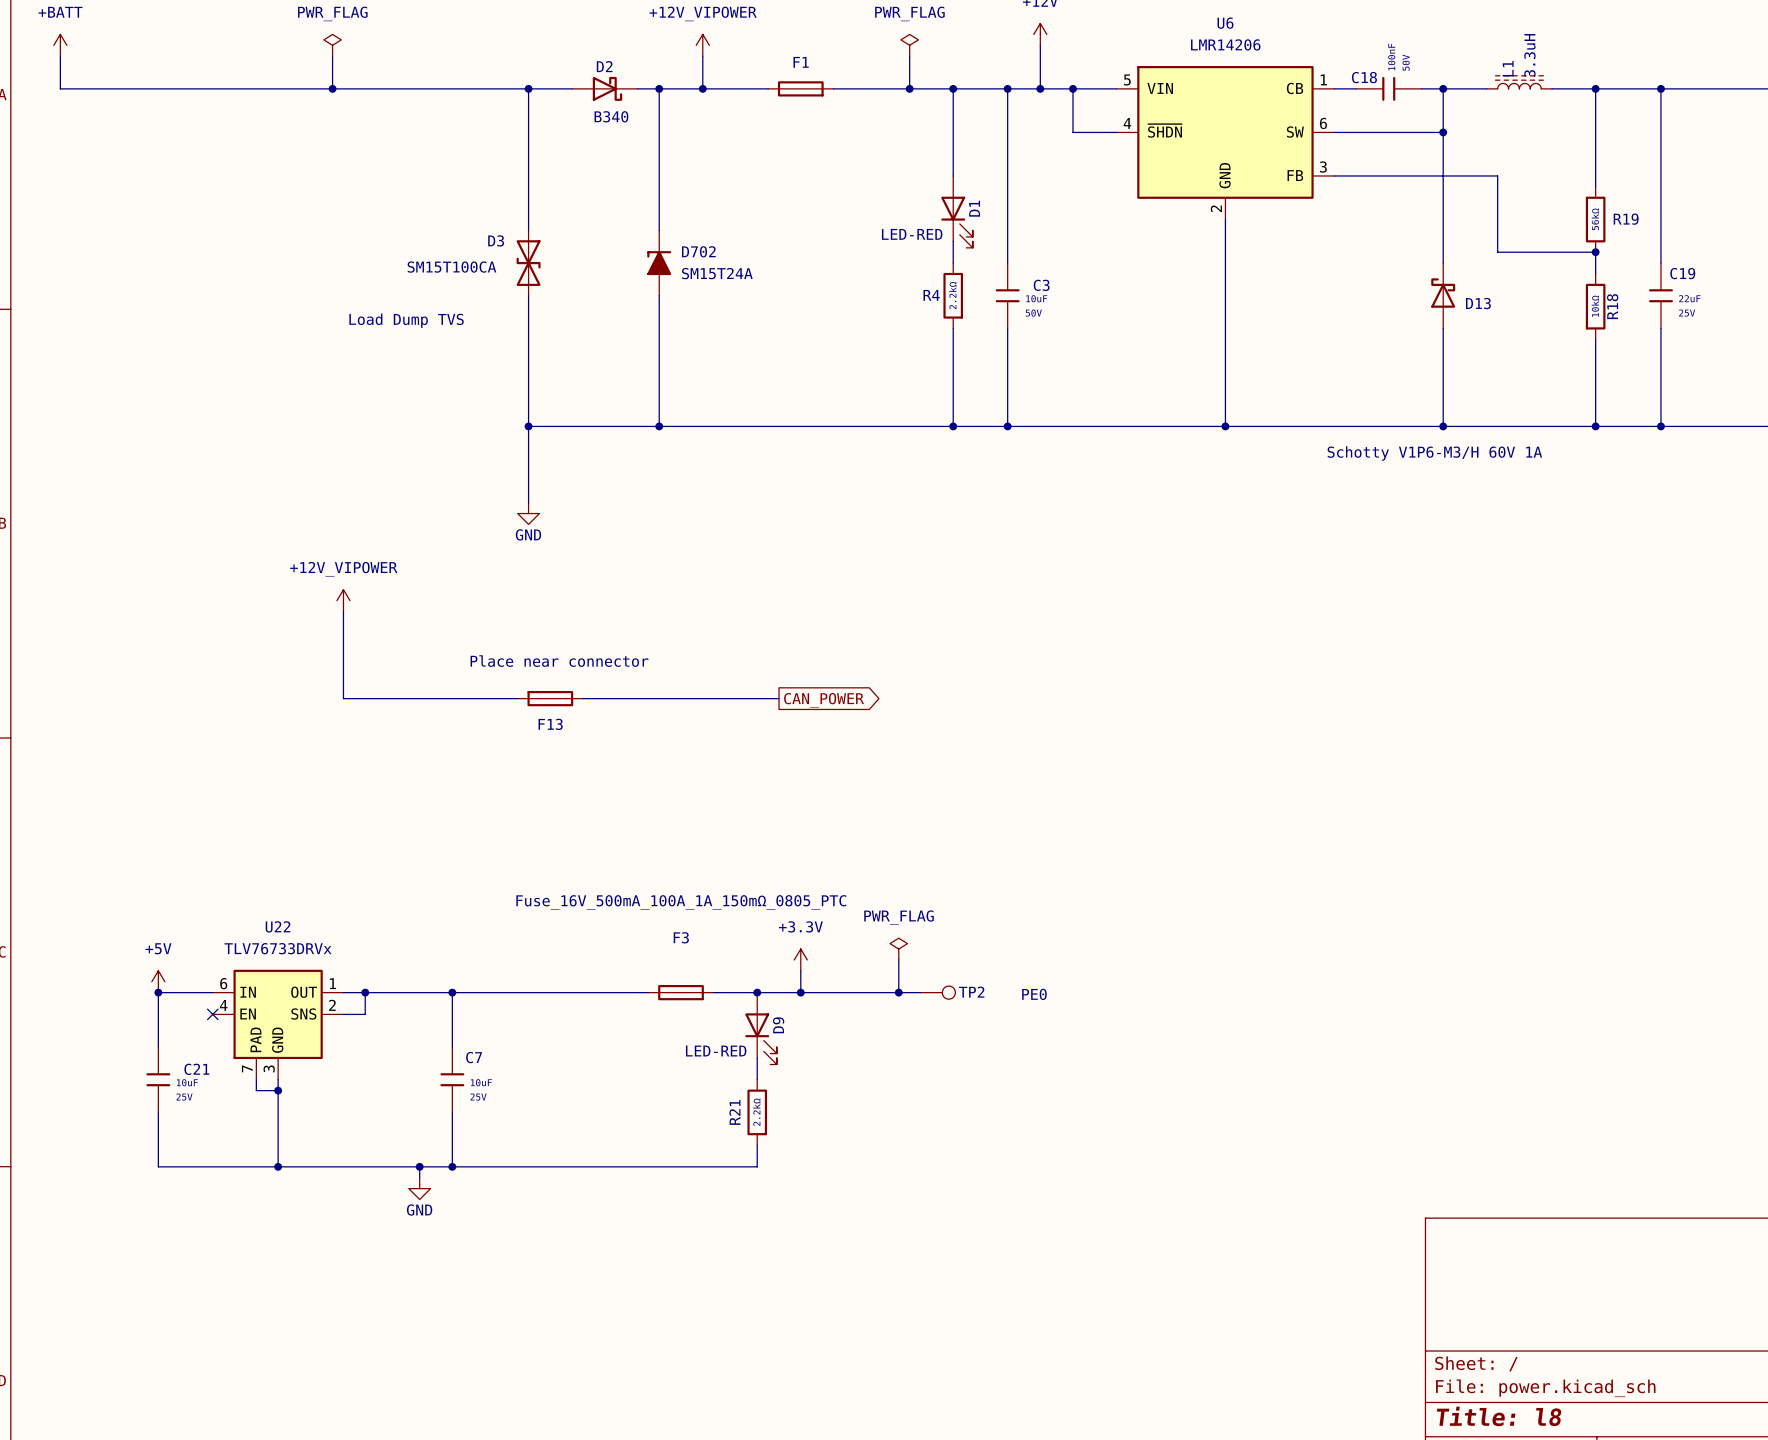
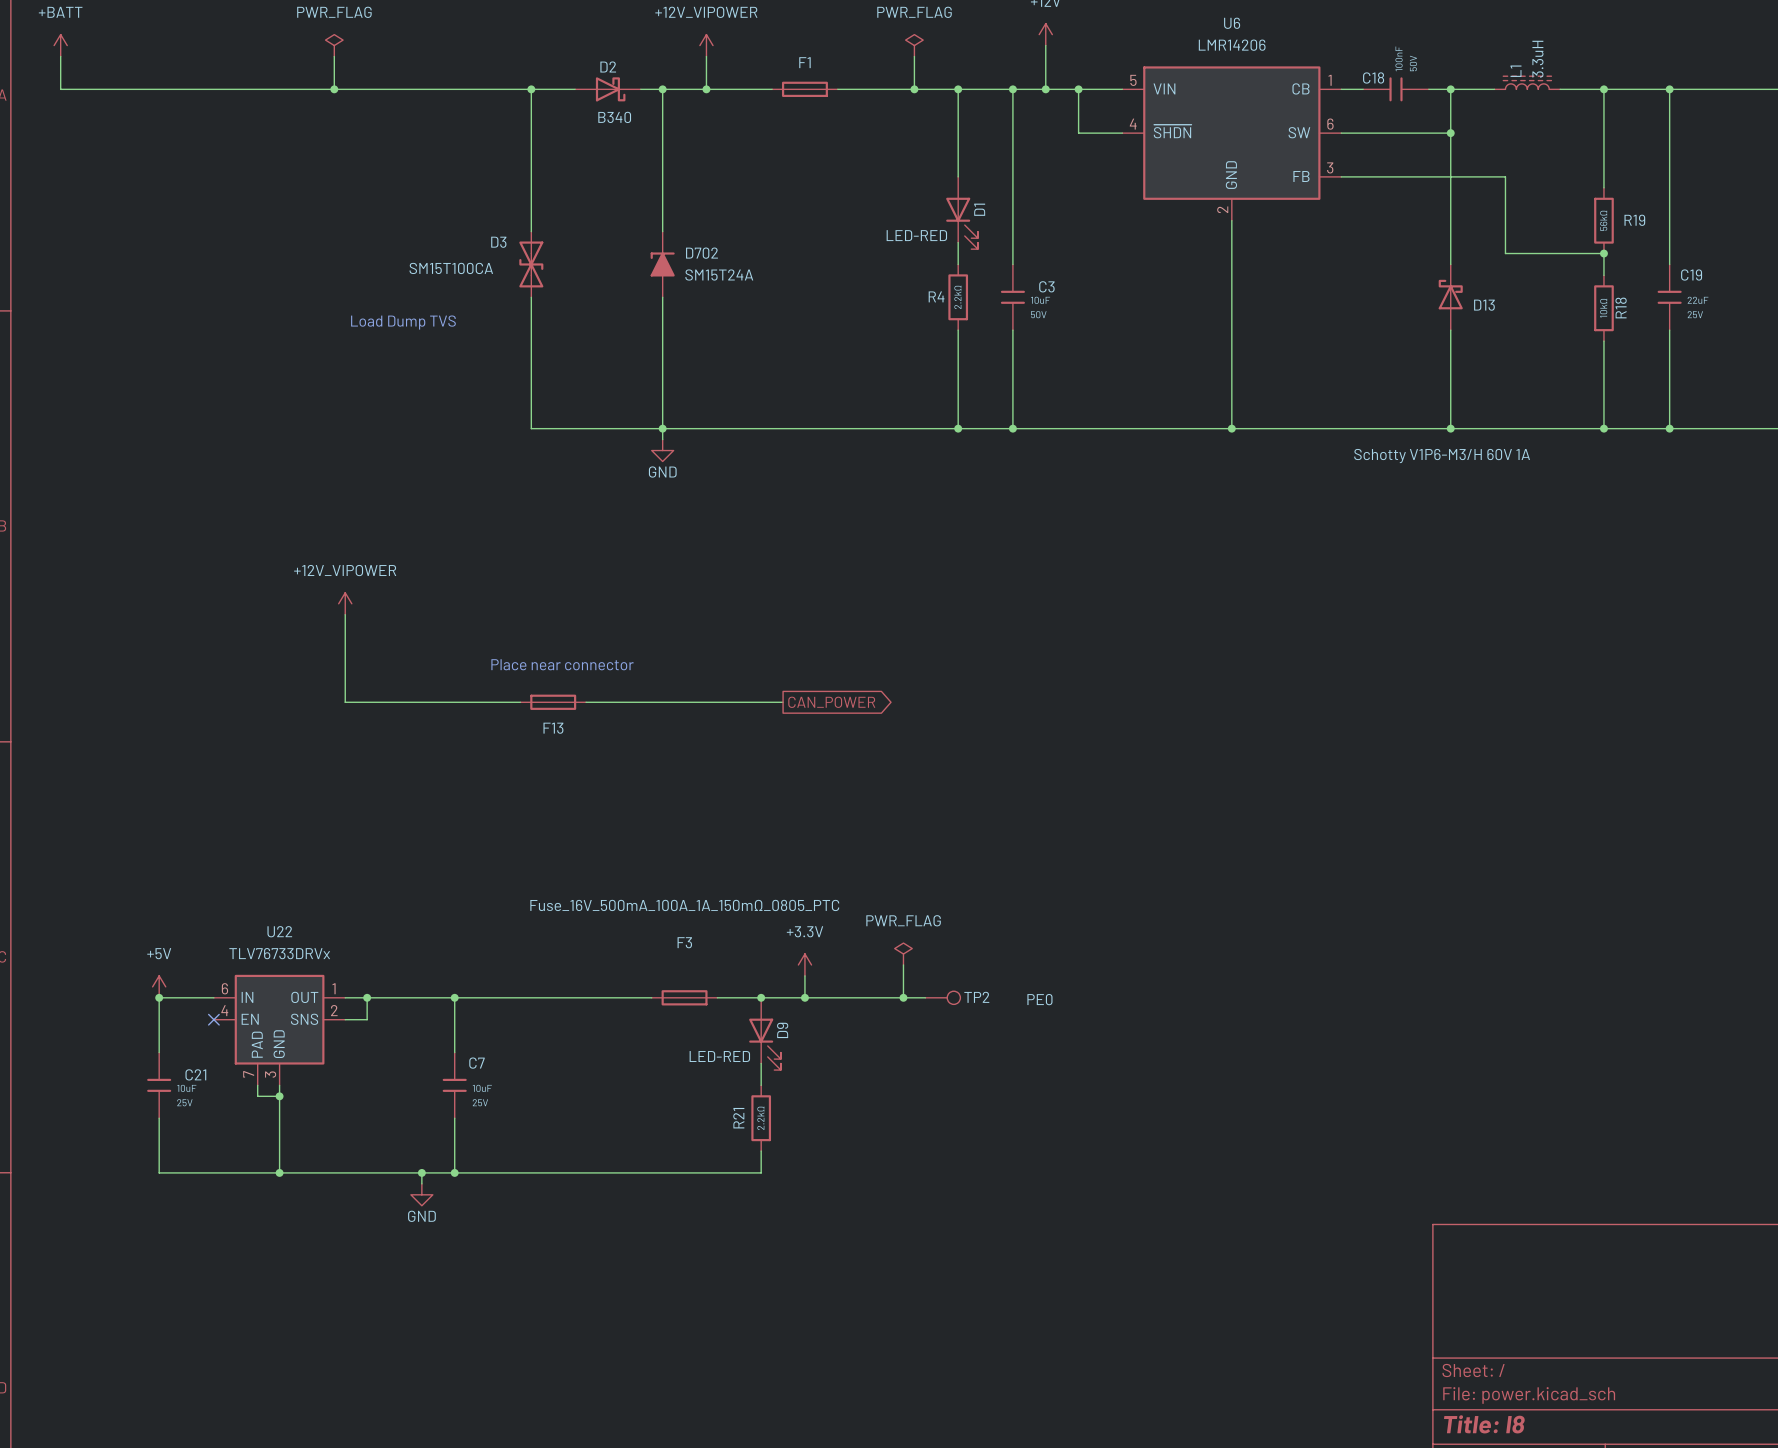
wire: (528, 426) (528, 502) -> none
junction: (528, 426) -> none
wire: none -> (662, 428) (662, 439)
power symbol position: GND (528, 513) -> GND (662, 450)

